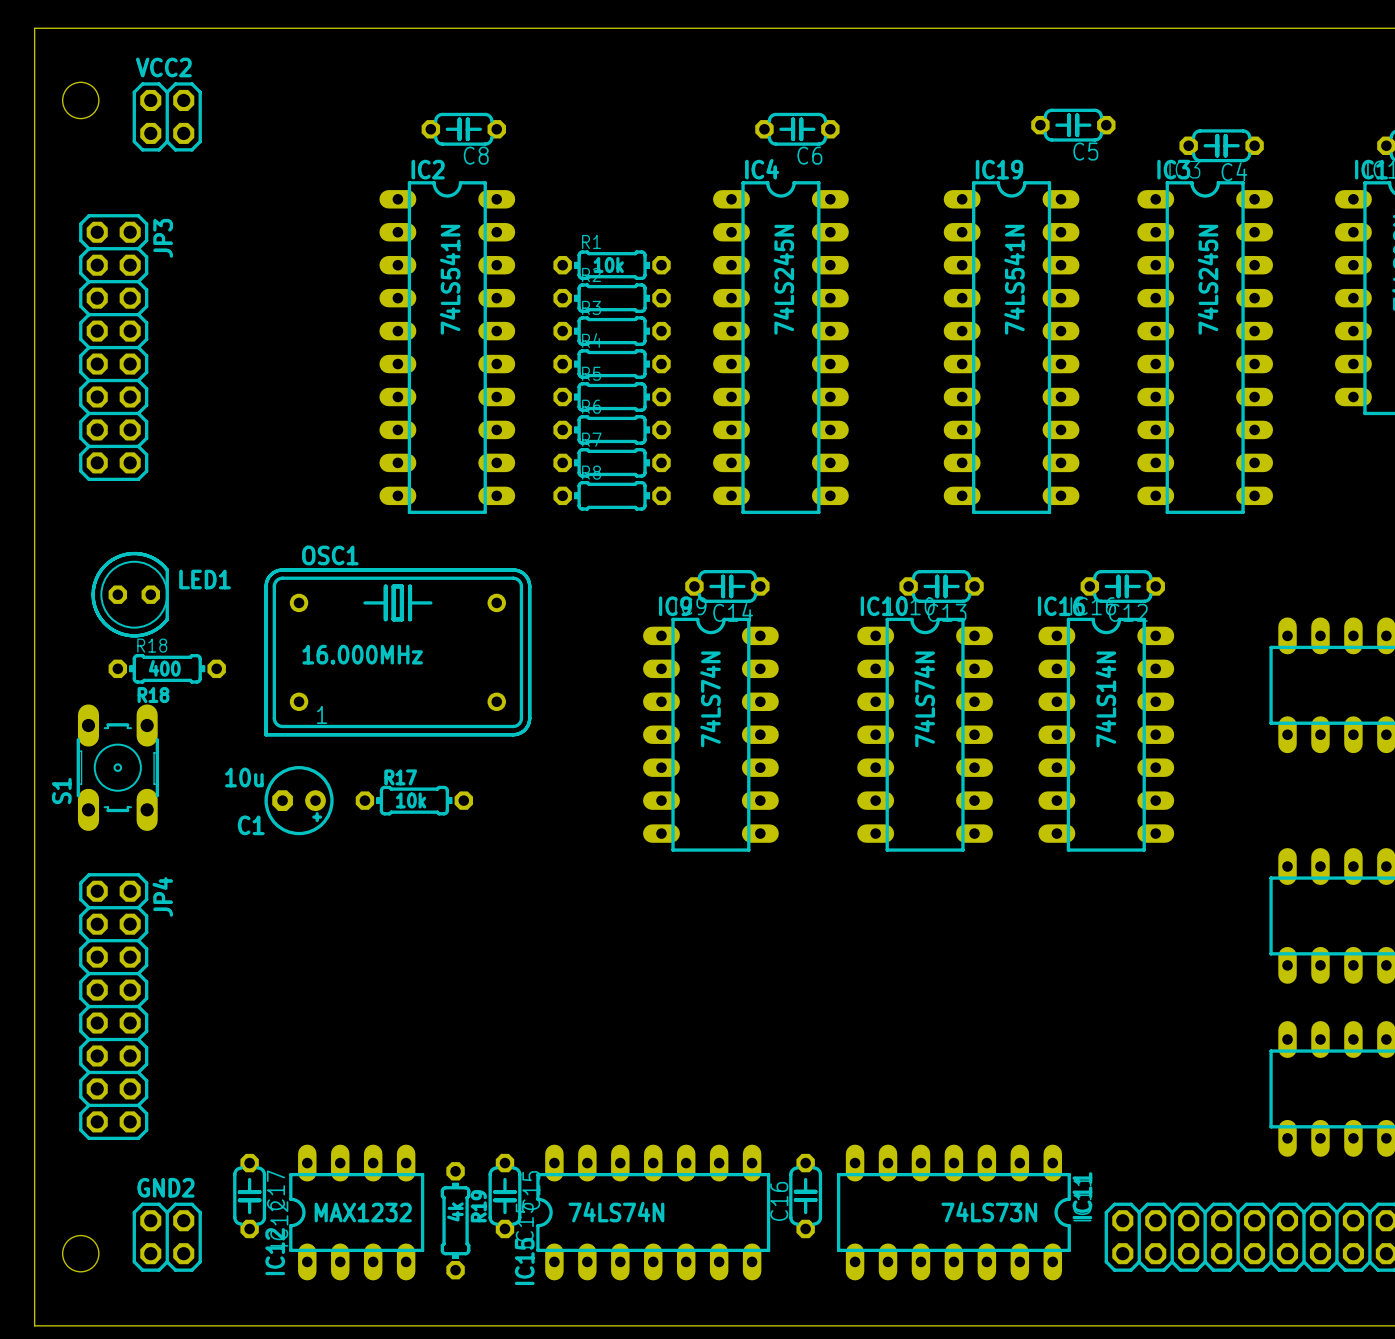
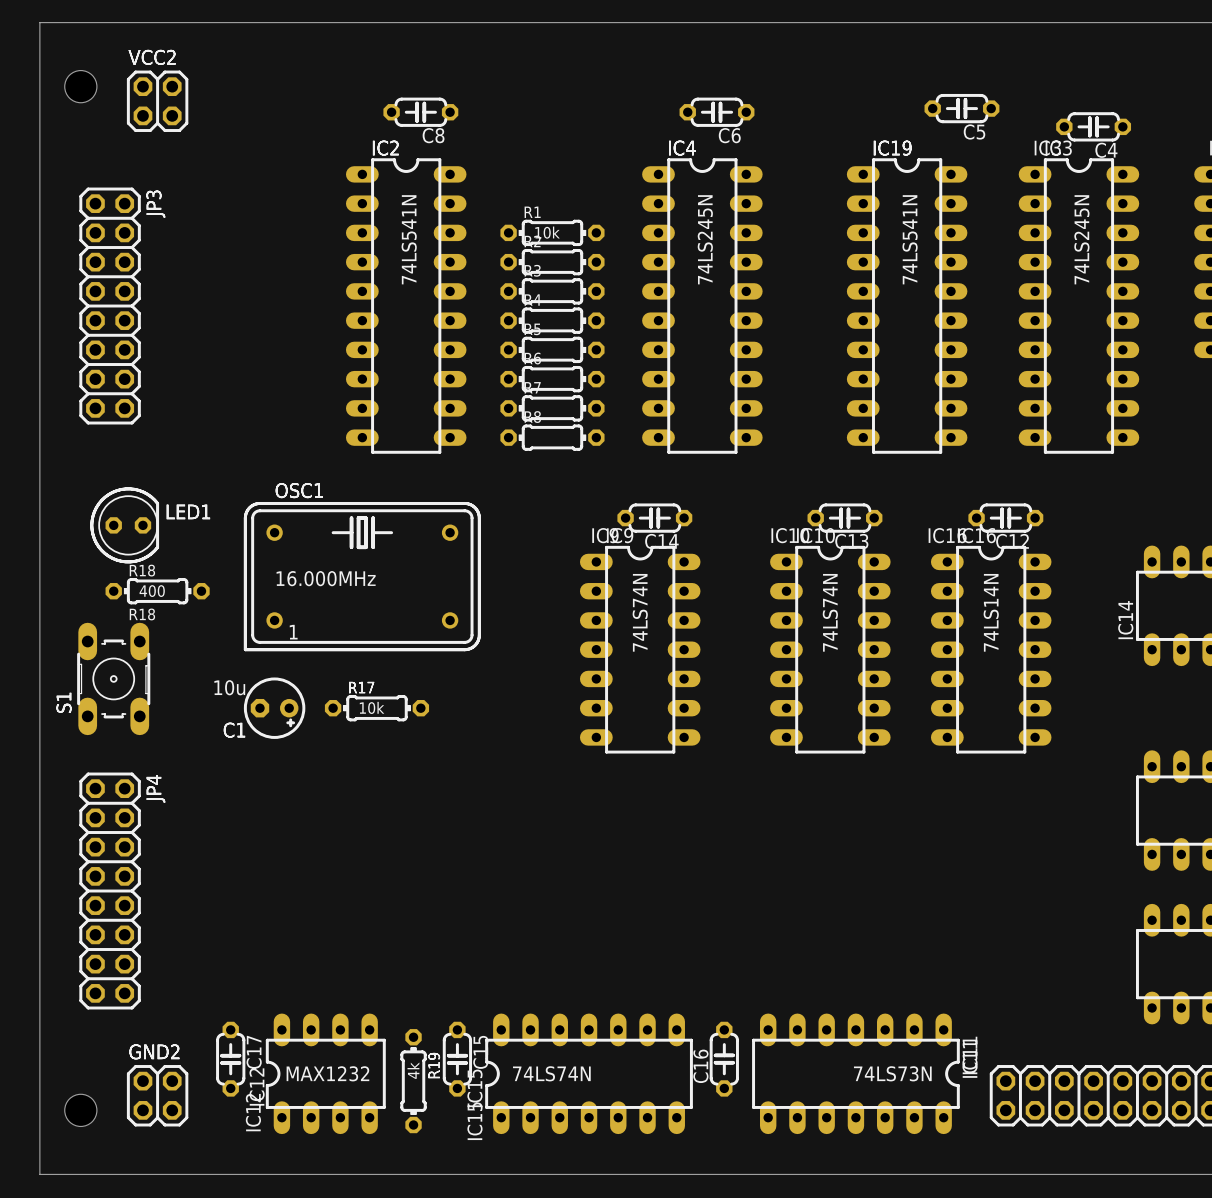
text: none -> IC14 (1125, 620)

